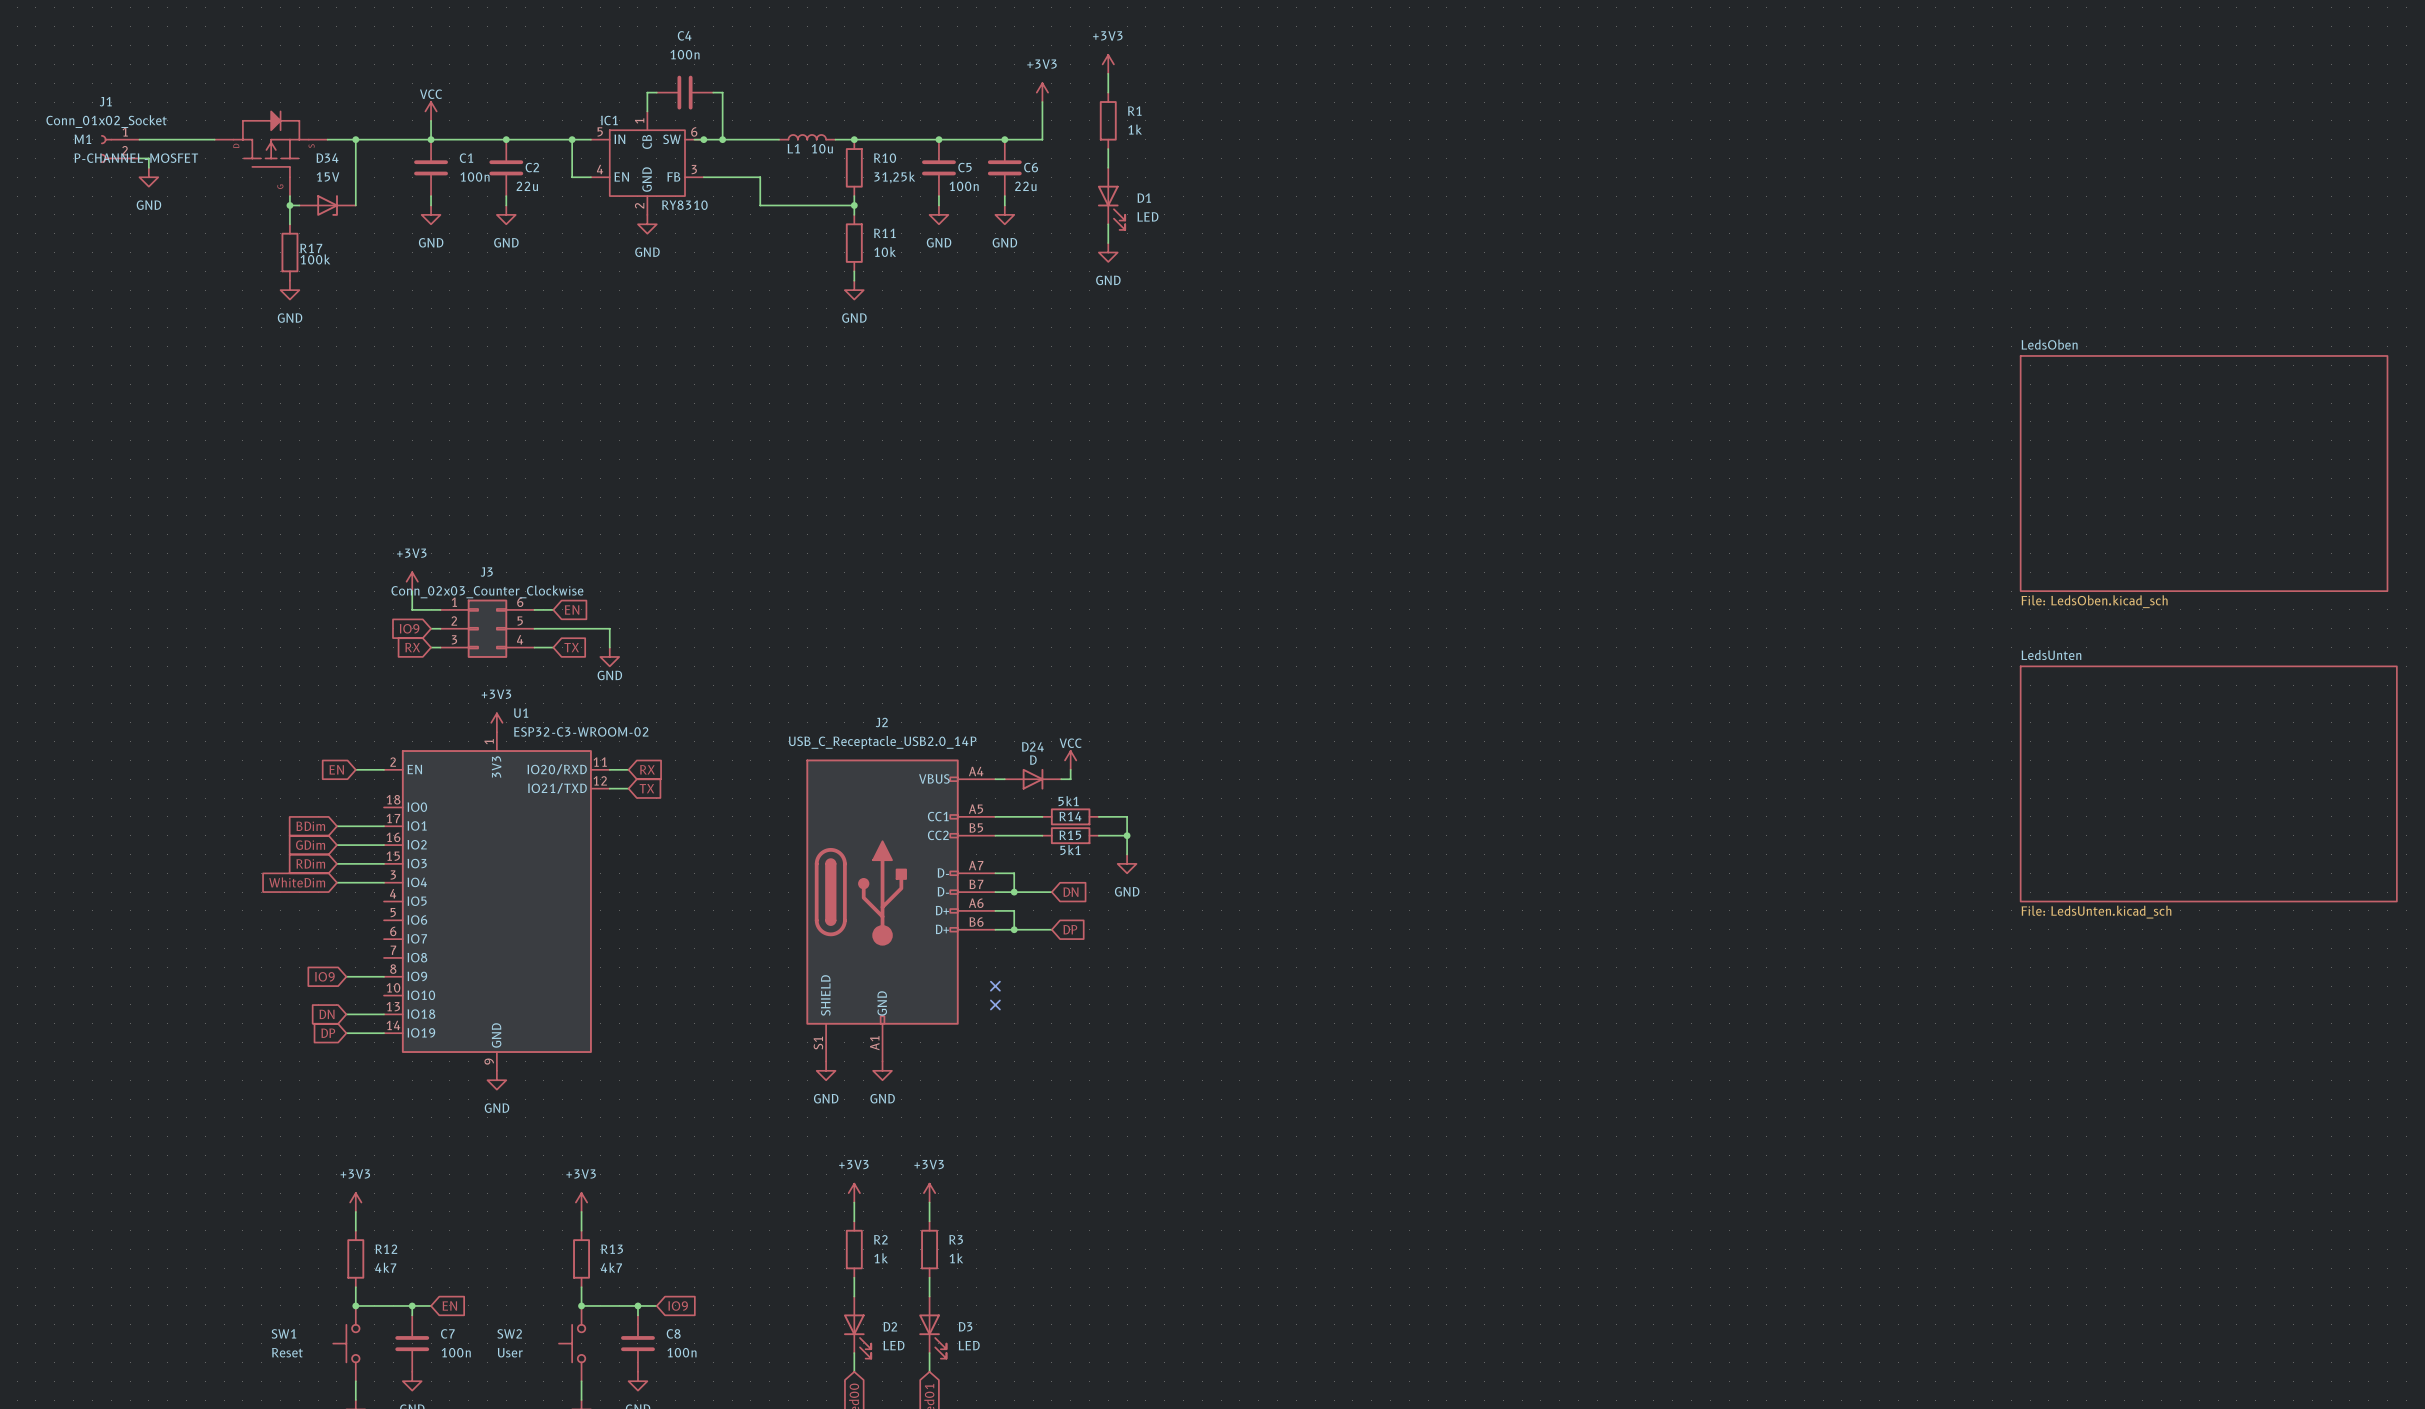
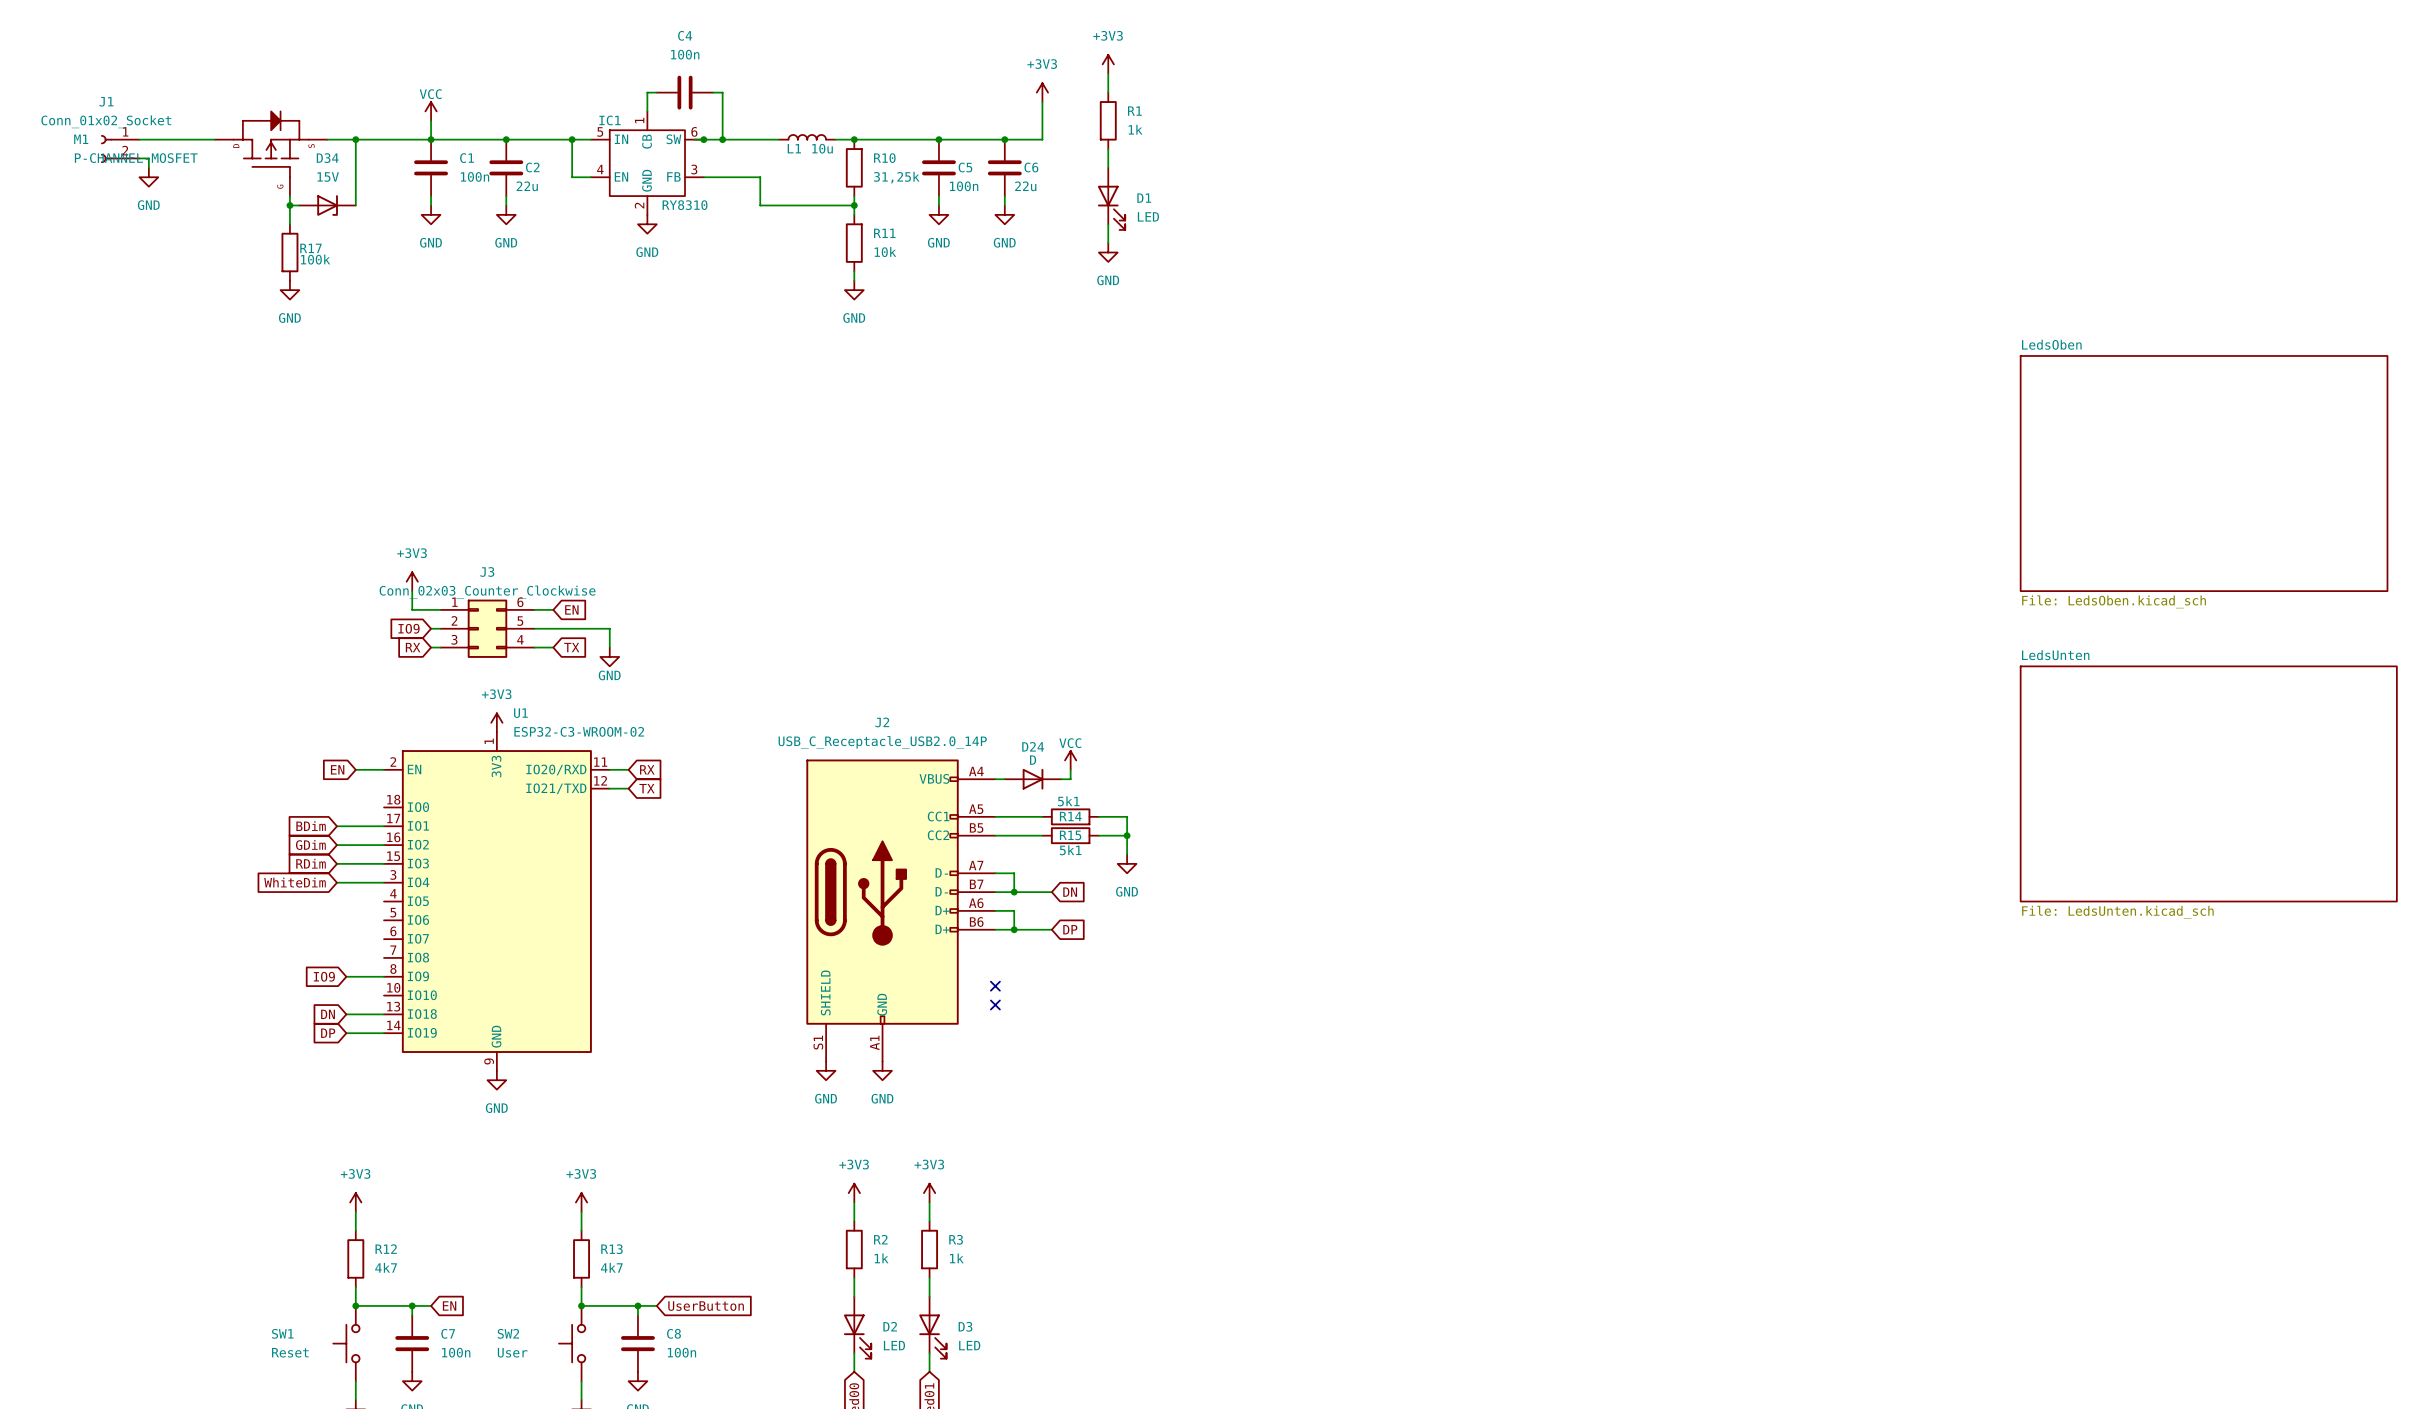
global label: IO9 (678, 1306) -> UserButton (706, 1306)

